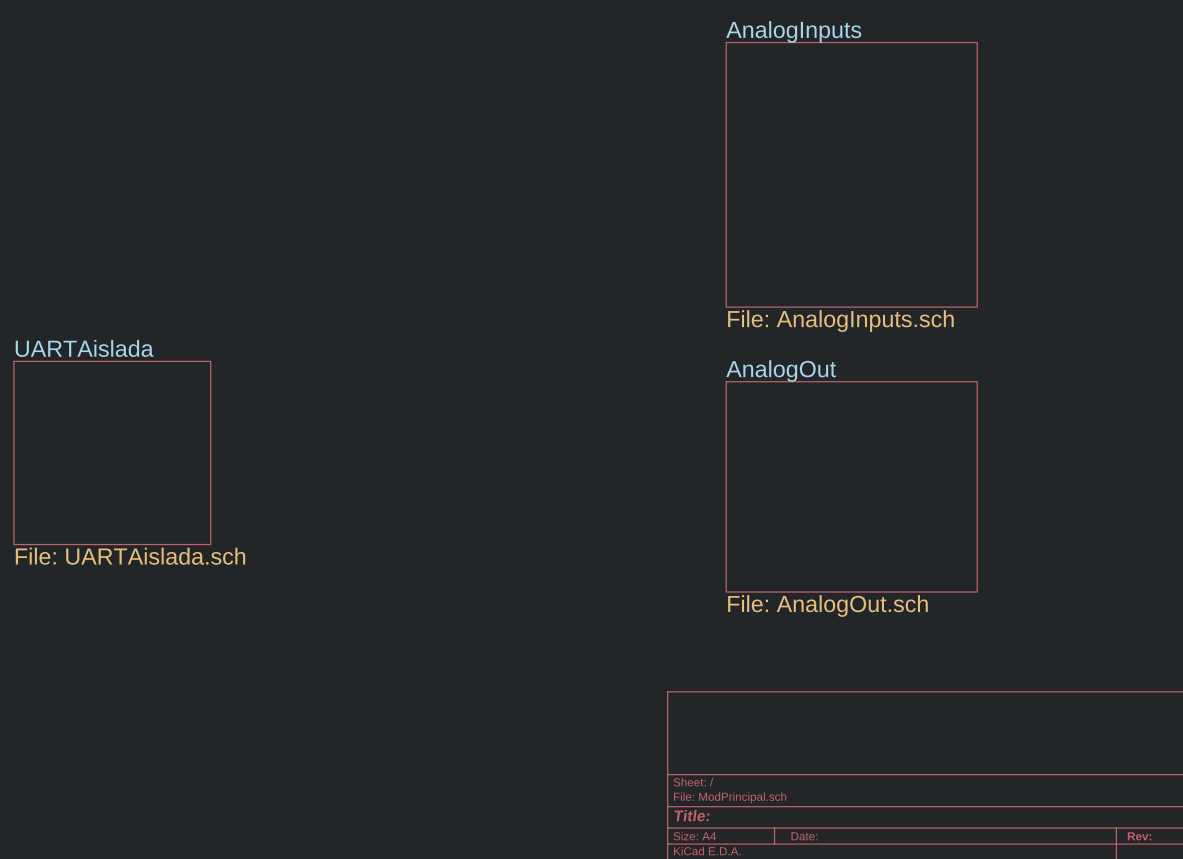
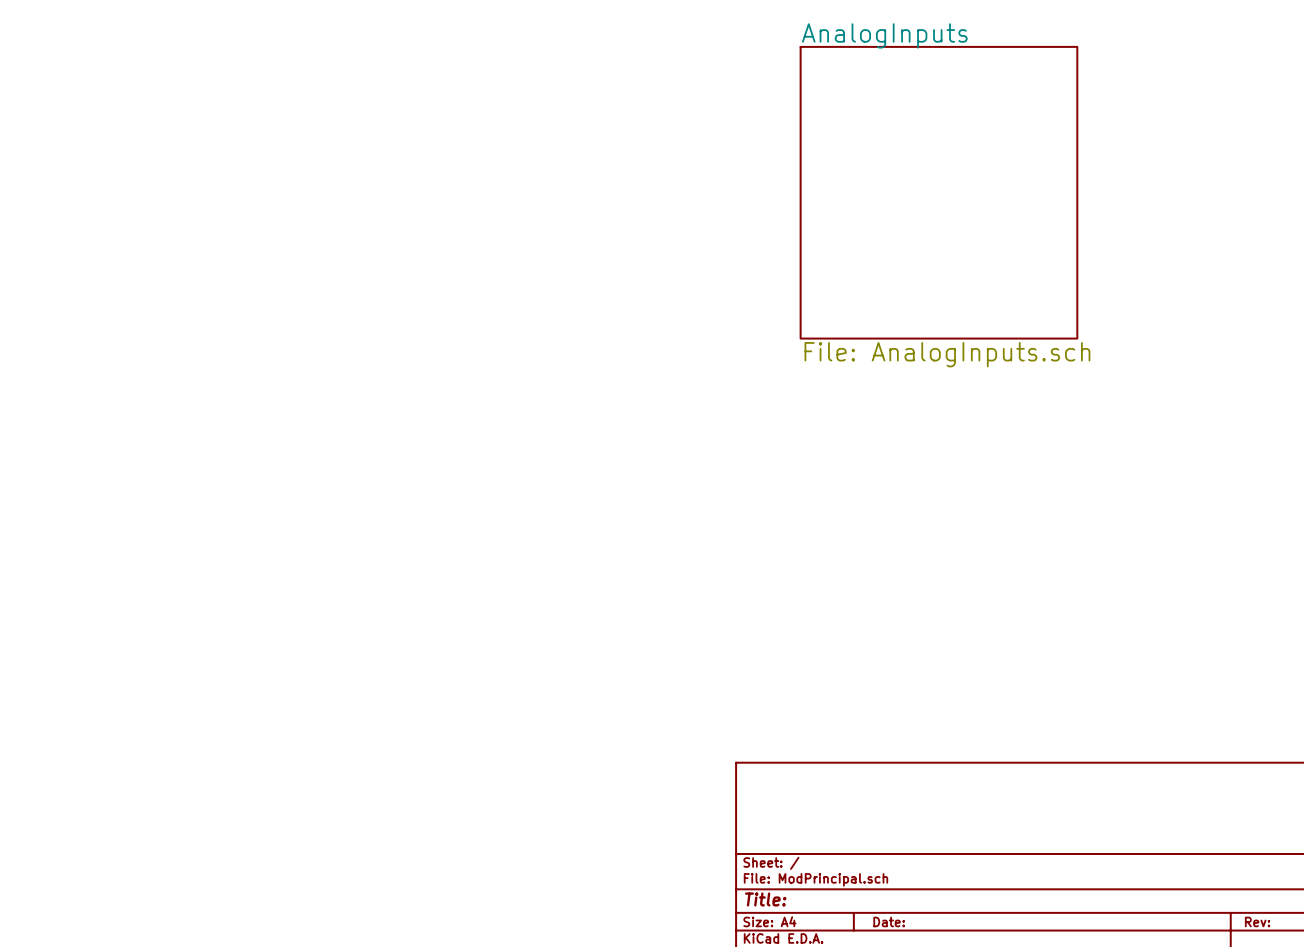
sheet UARTAislada: File: UARTAislada.sch (112, 452) -> none
sheet AnalogOut: File: AnalogOut.sch (851, 486) -> none

